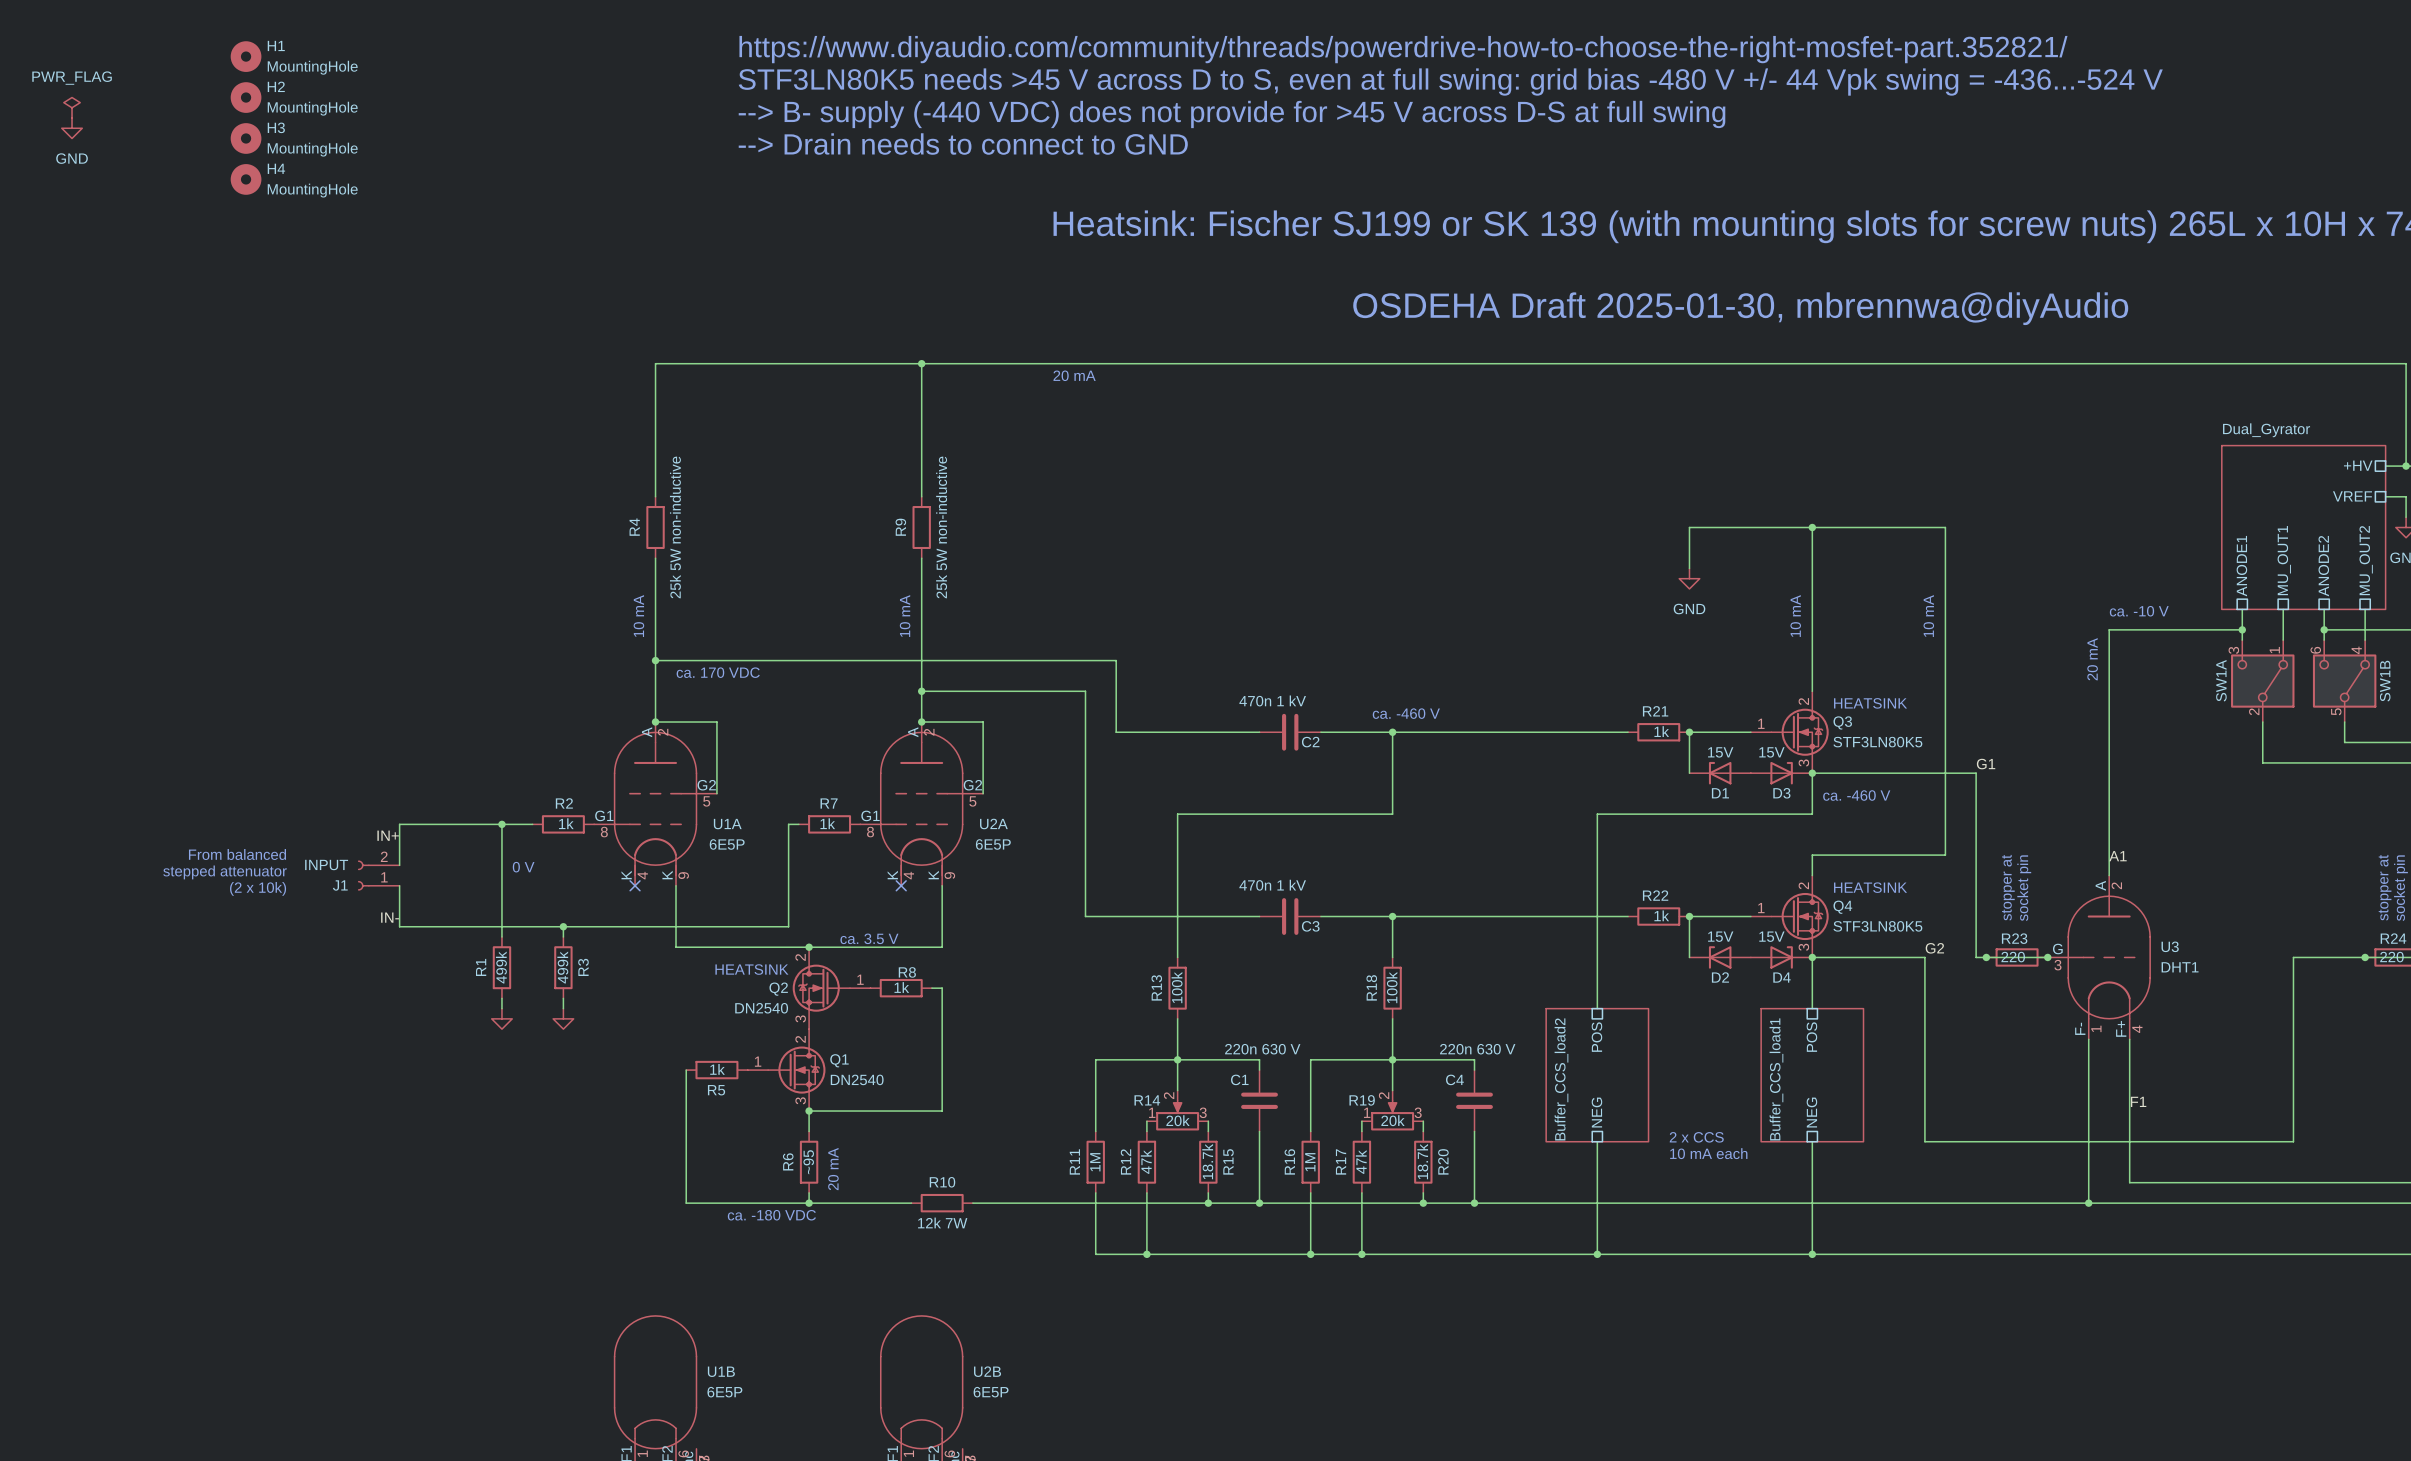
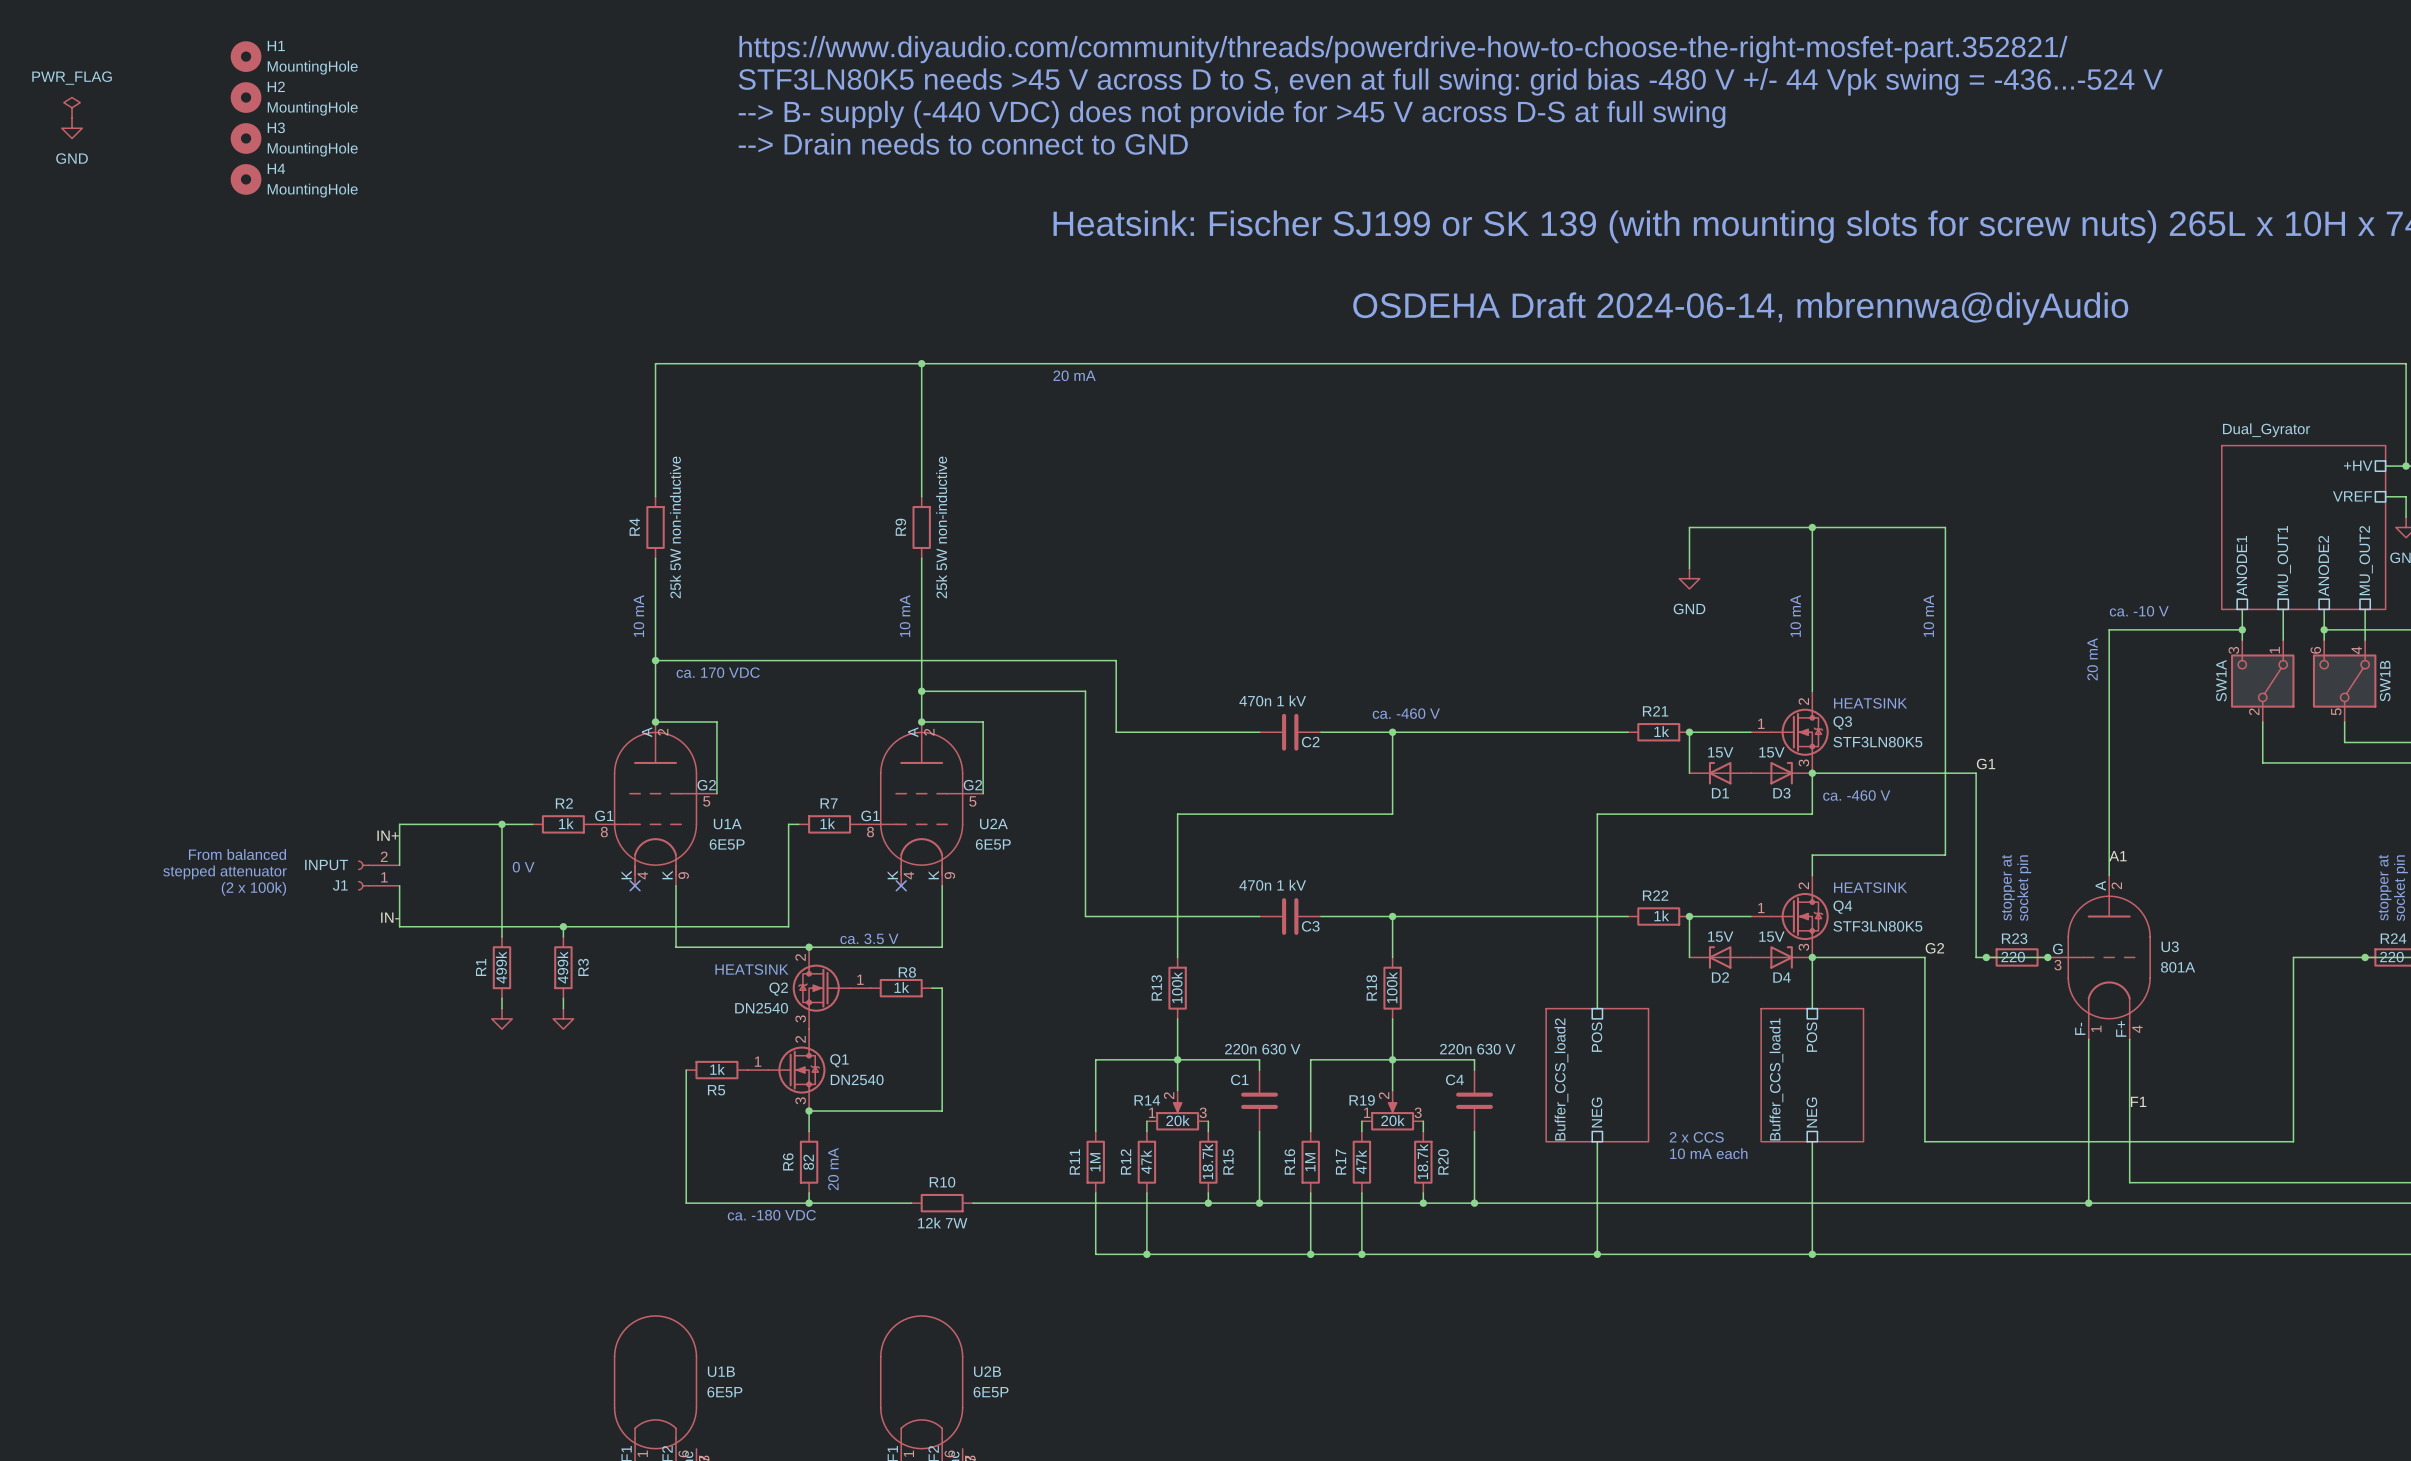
text: OSDEHA Draft 2025-01-30, mbrennwa@diyAudio (1740, 308) -> OSDEHA Draft 2024-06-14, mbrennwa@diyAudio (1740, 308)
text: (2 x 10k) (258, 888) -> (2 x 100k) (253, 888)
U3 value: DHT1 (2180, 967) -> 801A (2178, 967)
R6 value: ~95 (808, 1162) -> 82 (808, 1162)

